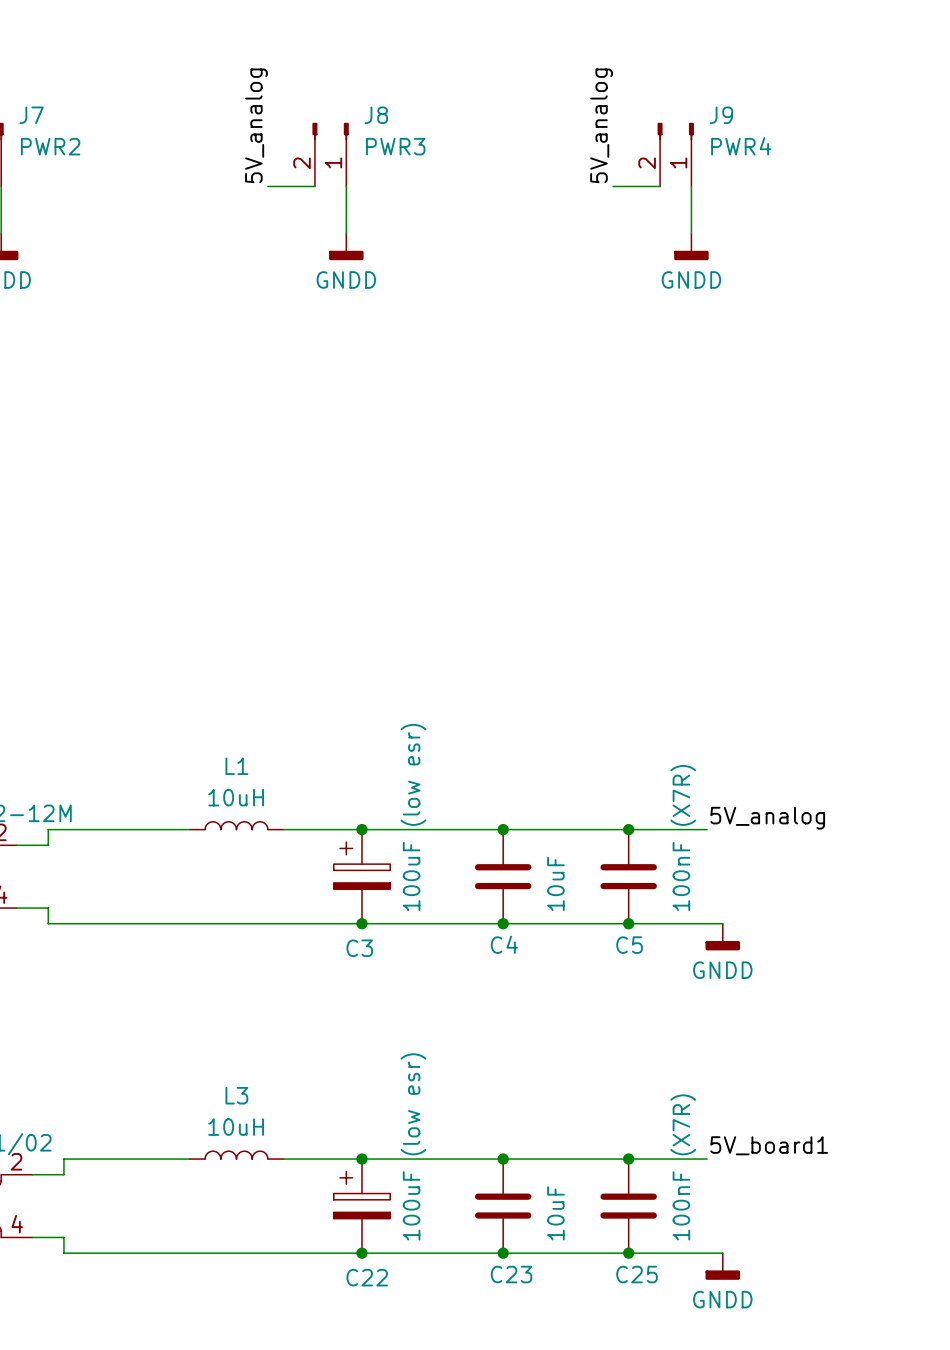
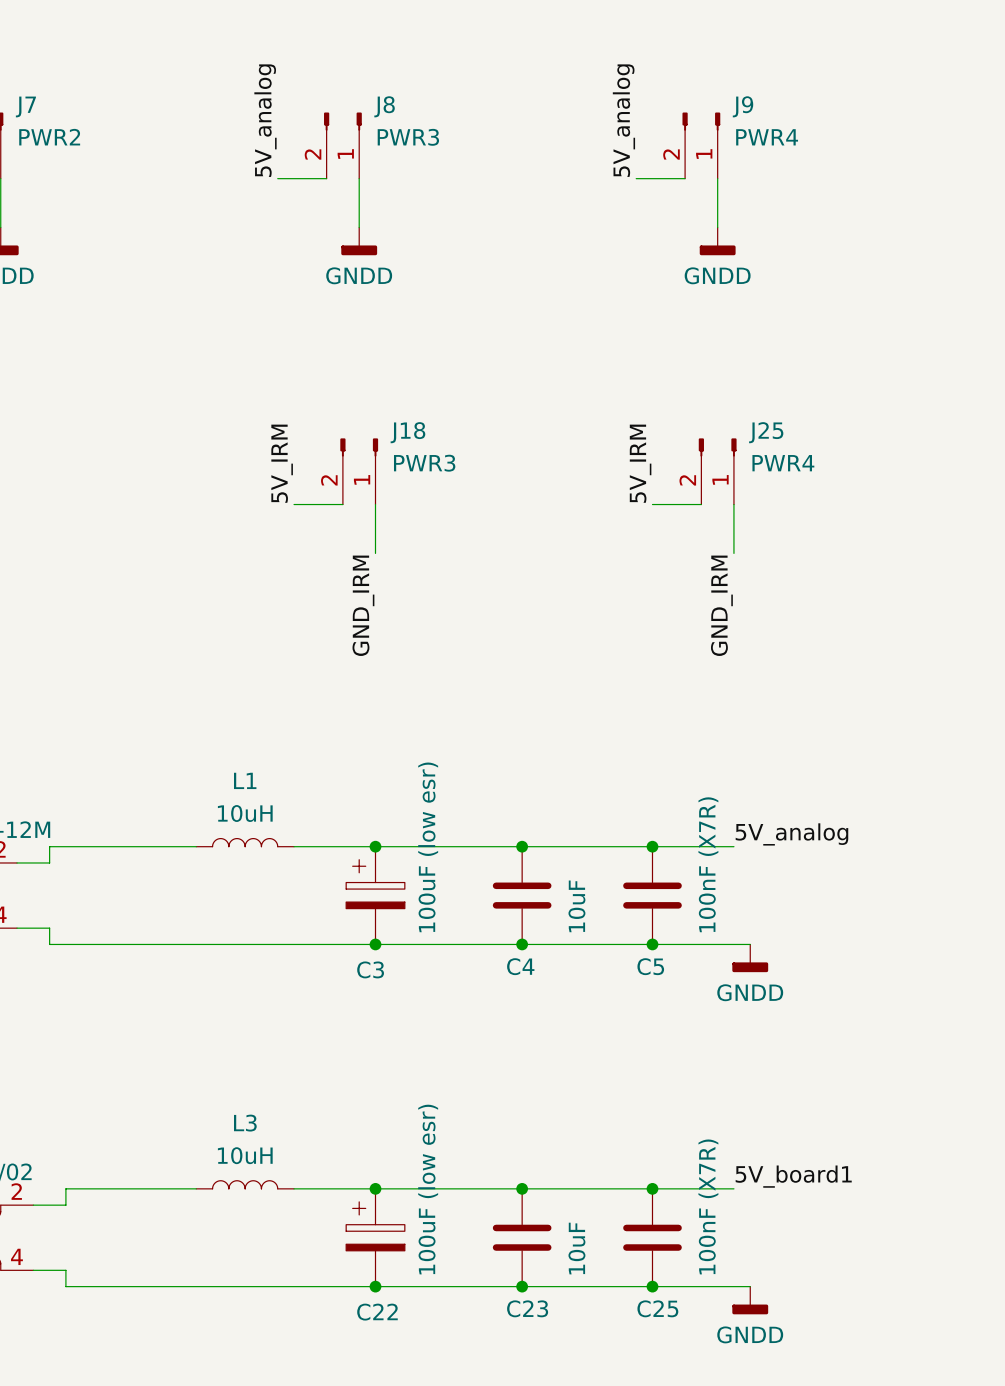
label: none -> 5V_IRM (282, 463)
label: none -> 5V_IRM (640, 463)
J18: none -> PWR3 (359, 471)
J25: none -> PWR4 (717, 471)
wire: none -> (294, 504) (342, 504)
wire: none -> (375, 504) (375, 553)
wire: none -> (652, 504) (701, 504)
wire: none -> (733, 504) (733, 553)
label: none -> GND_IRM (363, 605)
label: none -> GND_IRM (721, 605)

